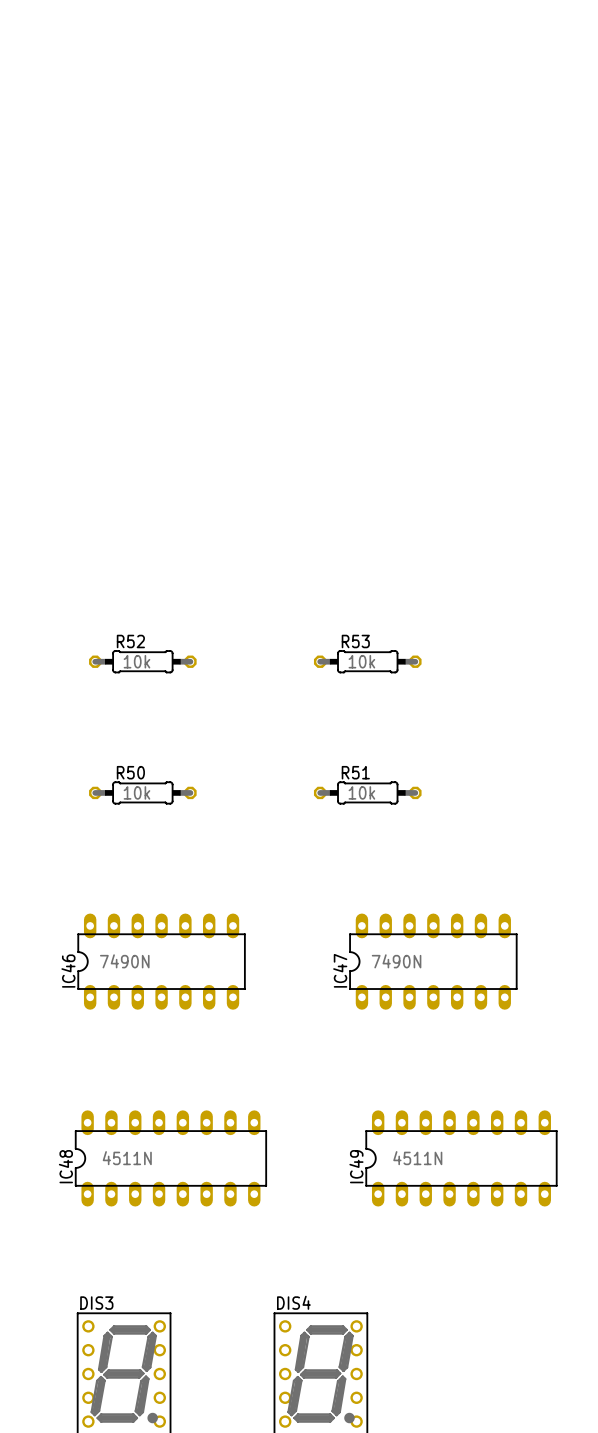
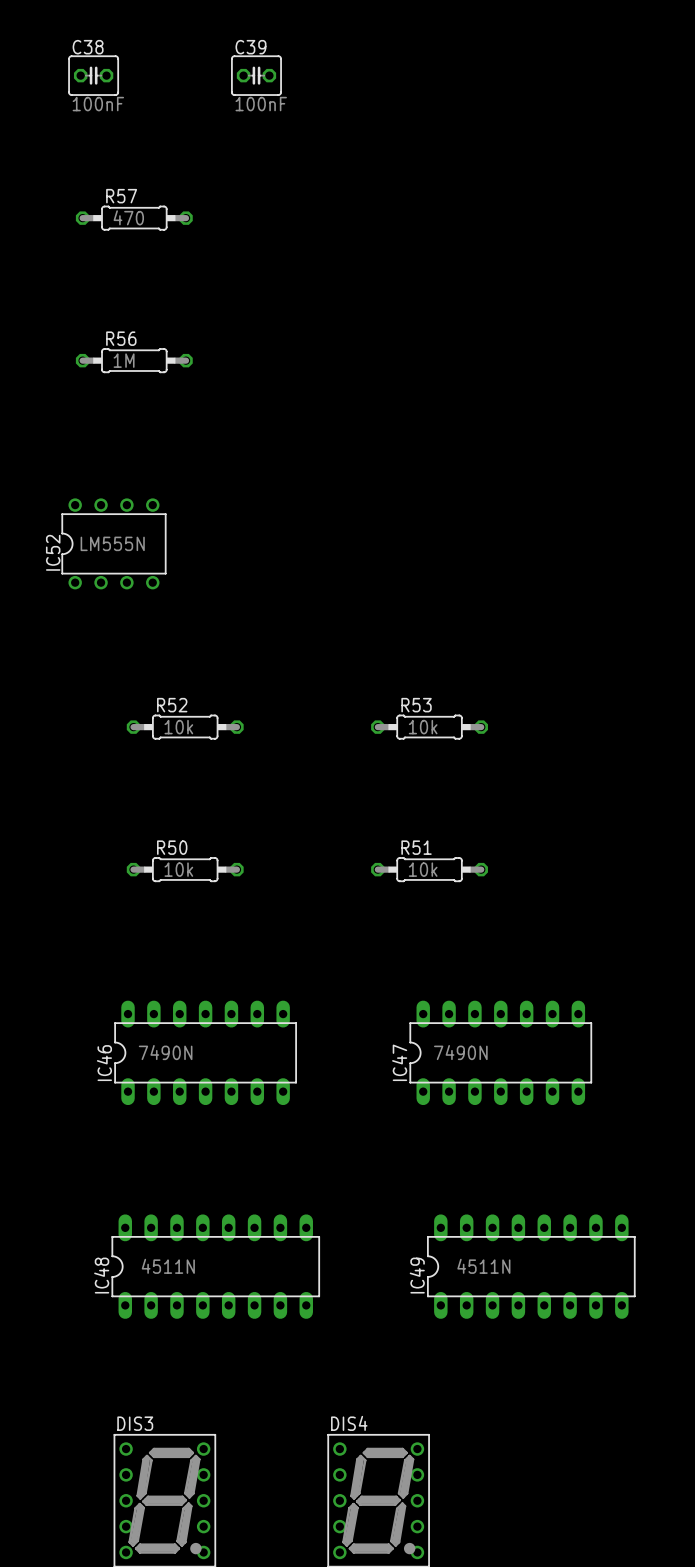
C38: none -> 100nF (93, 75)
C39: none -> 100nF (256, 75)
R57: none -> 470 (134, 218)
R56: none -> 1M (134, 360)
IC52: none -> LM555N (113, 543)

